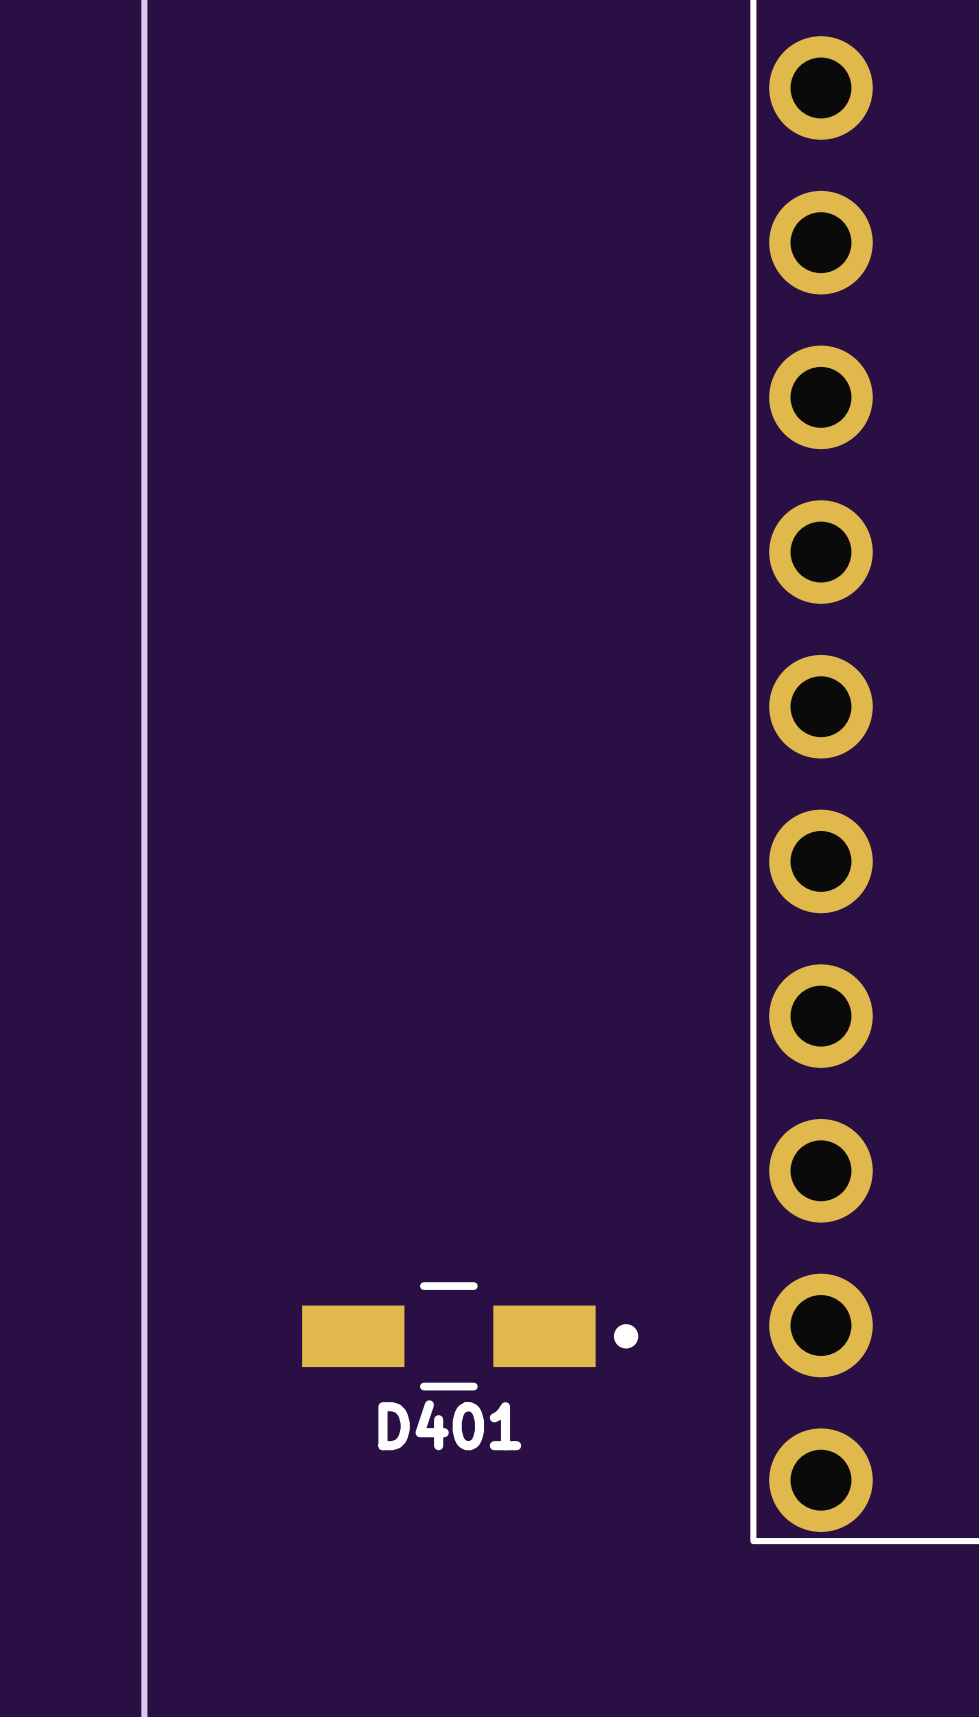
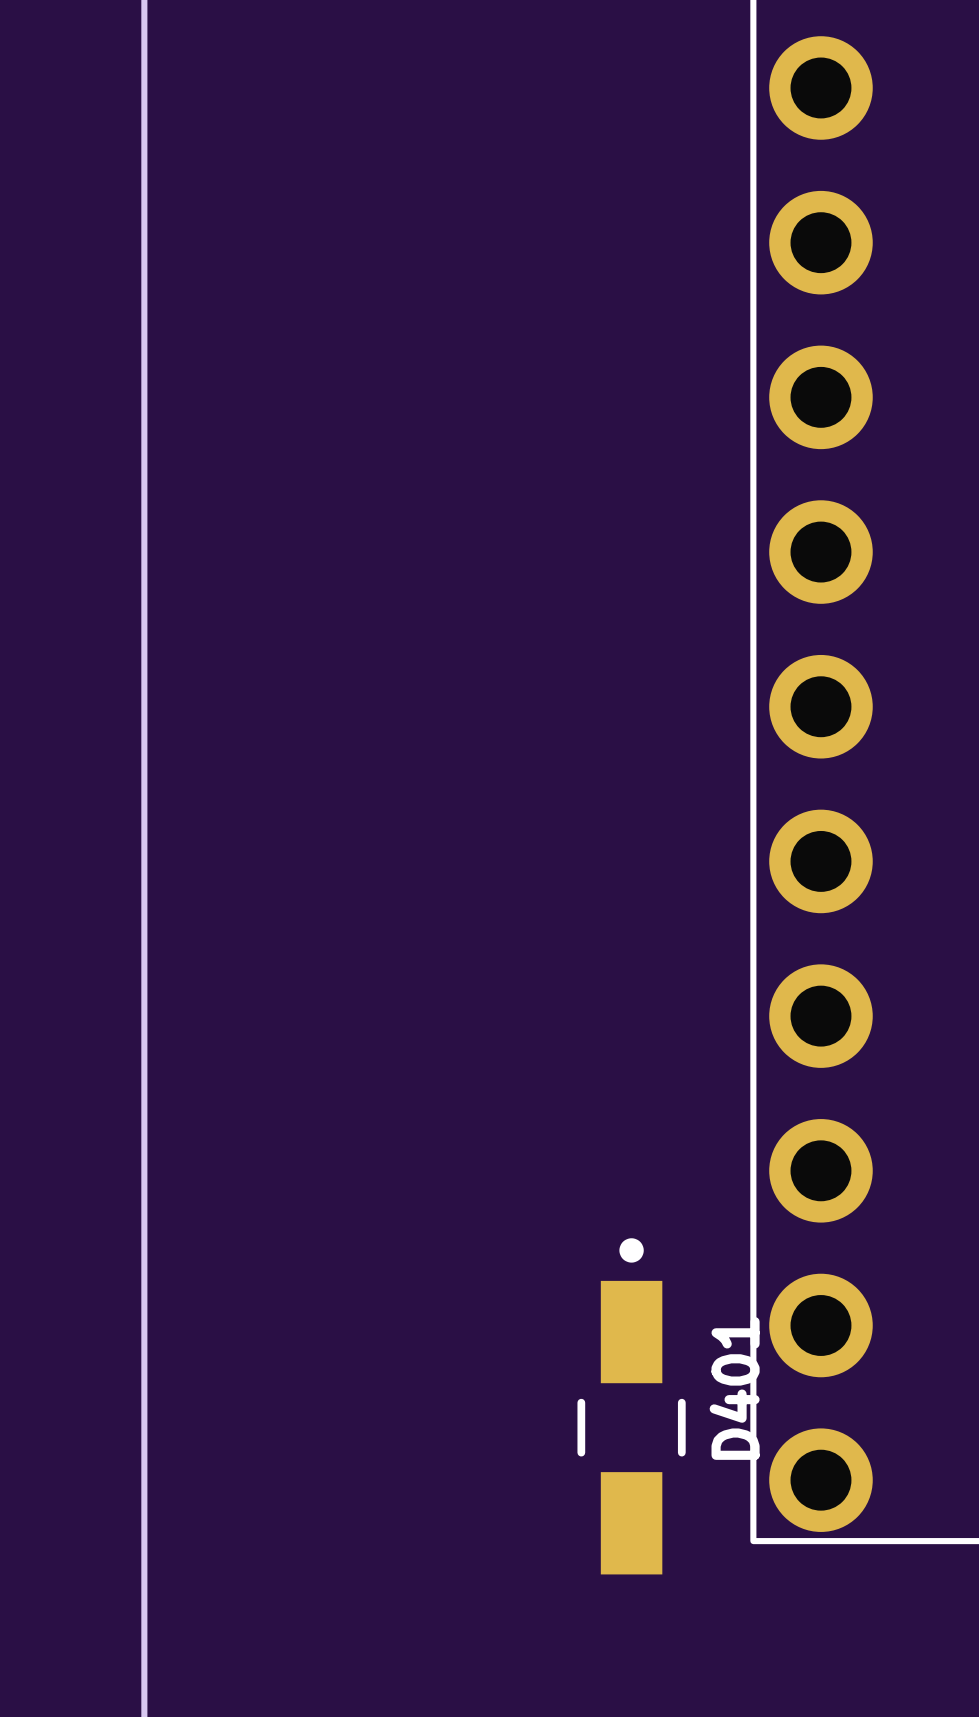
D401 rotation: 0° (470, 1336) -> 90° counterclockwise (631, 1406)

